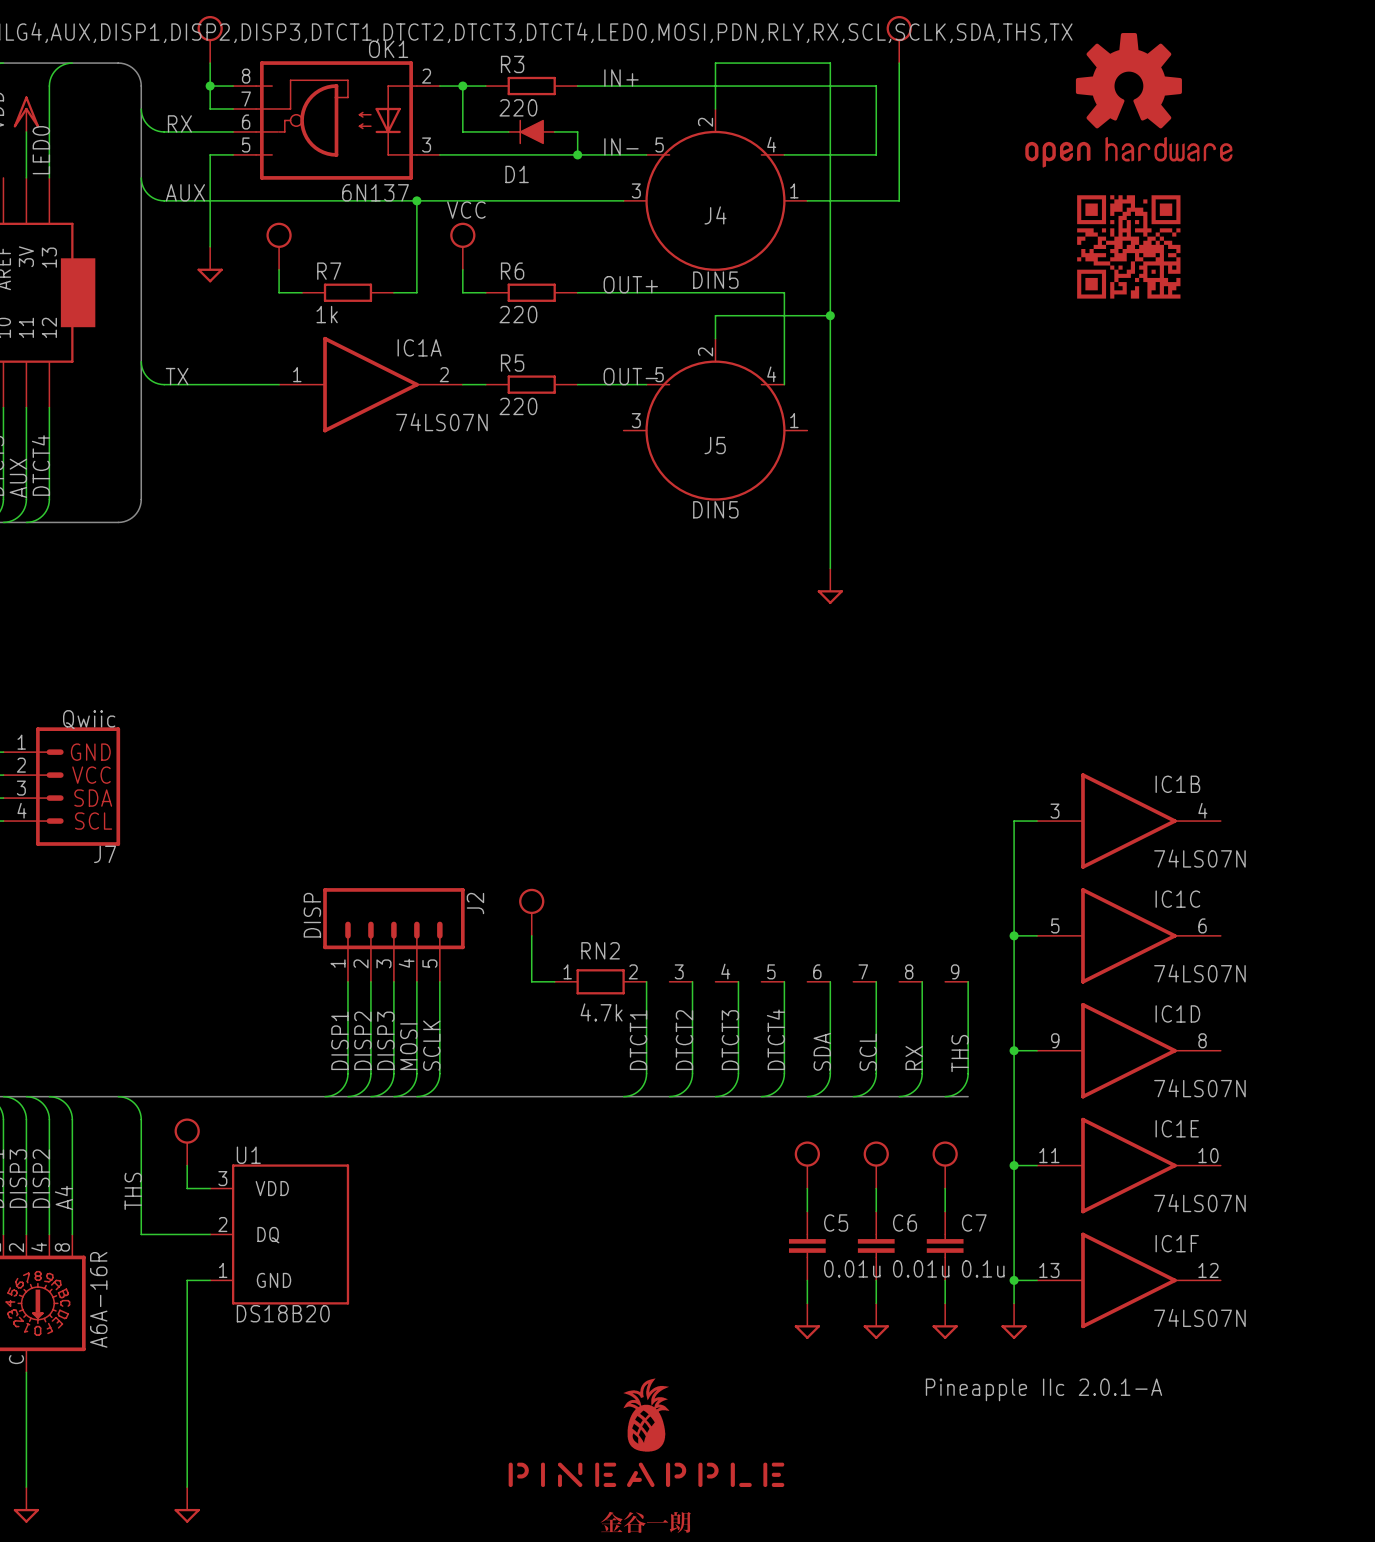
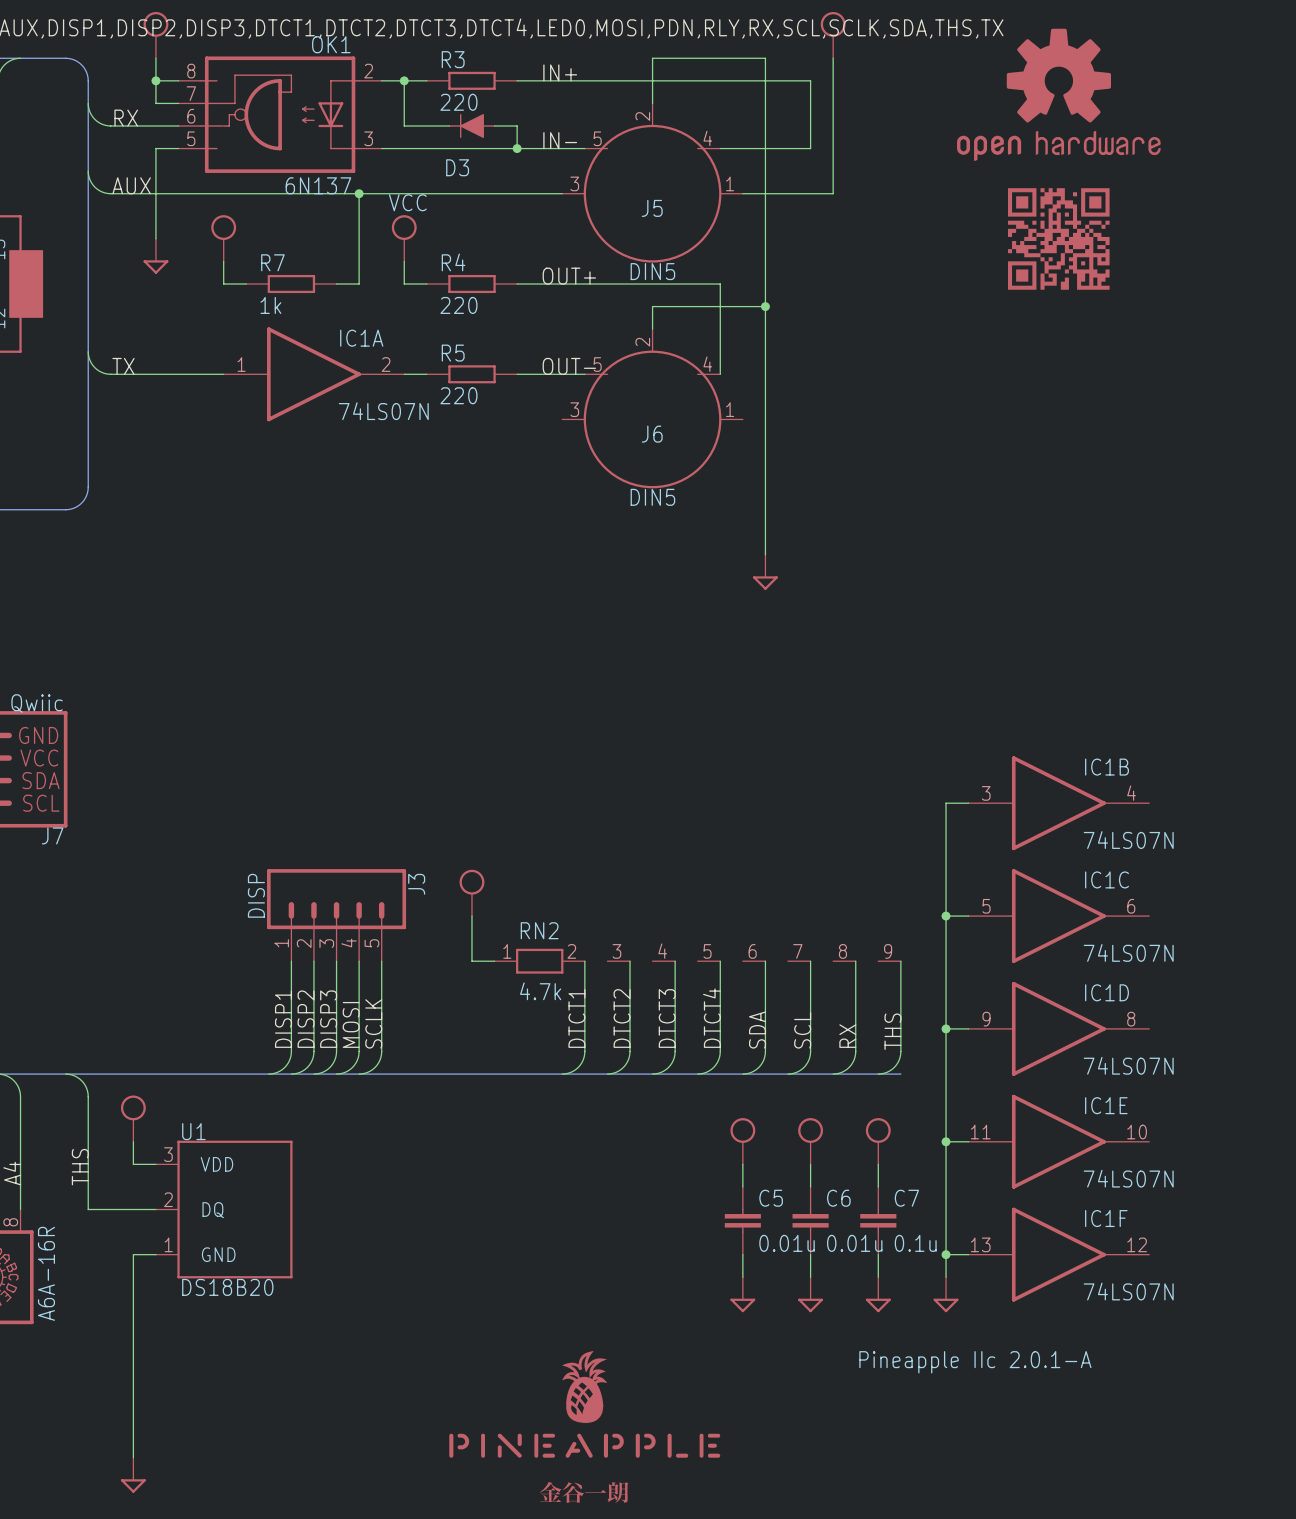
D1 name: D1 (517, 174) -> D3 (457, 167)
J4 name: J4 (715, 215) -> J5 (652, 208)
R6 name: R6 (512, 271) -> R4 (453, 262)
J5 name: J5 (715, 445) -> J6 (652, 434)
J2 name: J2 (475, 903) -> J3 (416, 884)

